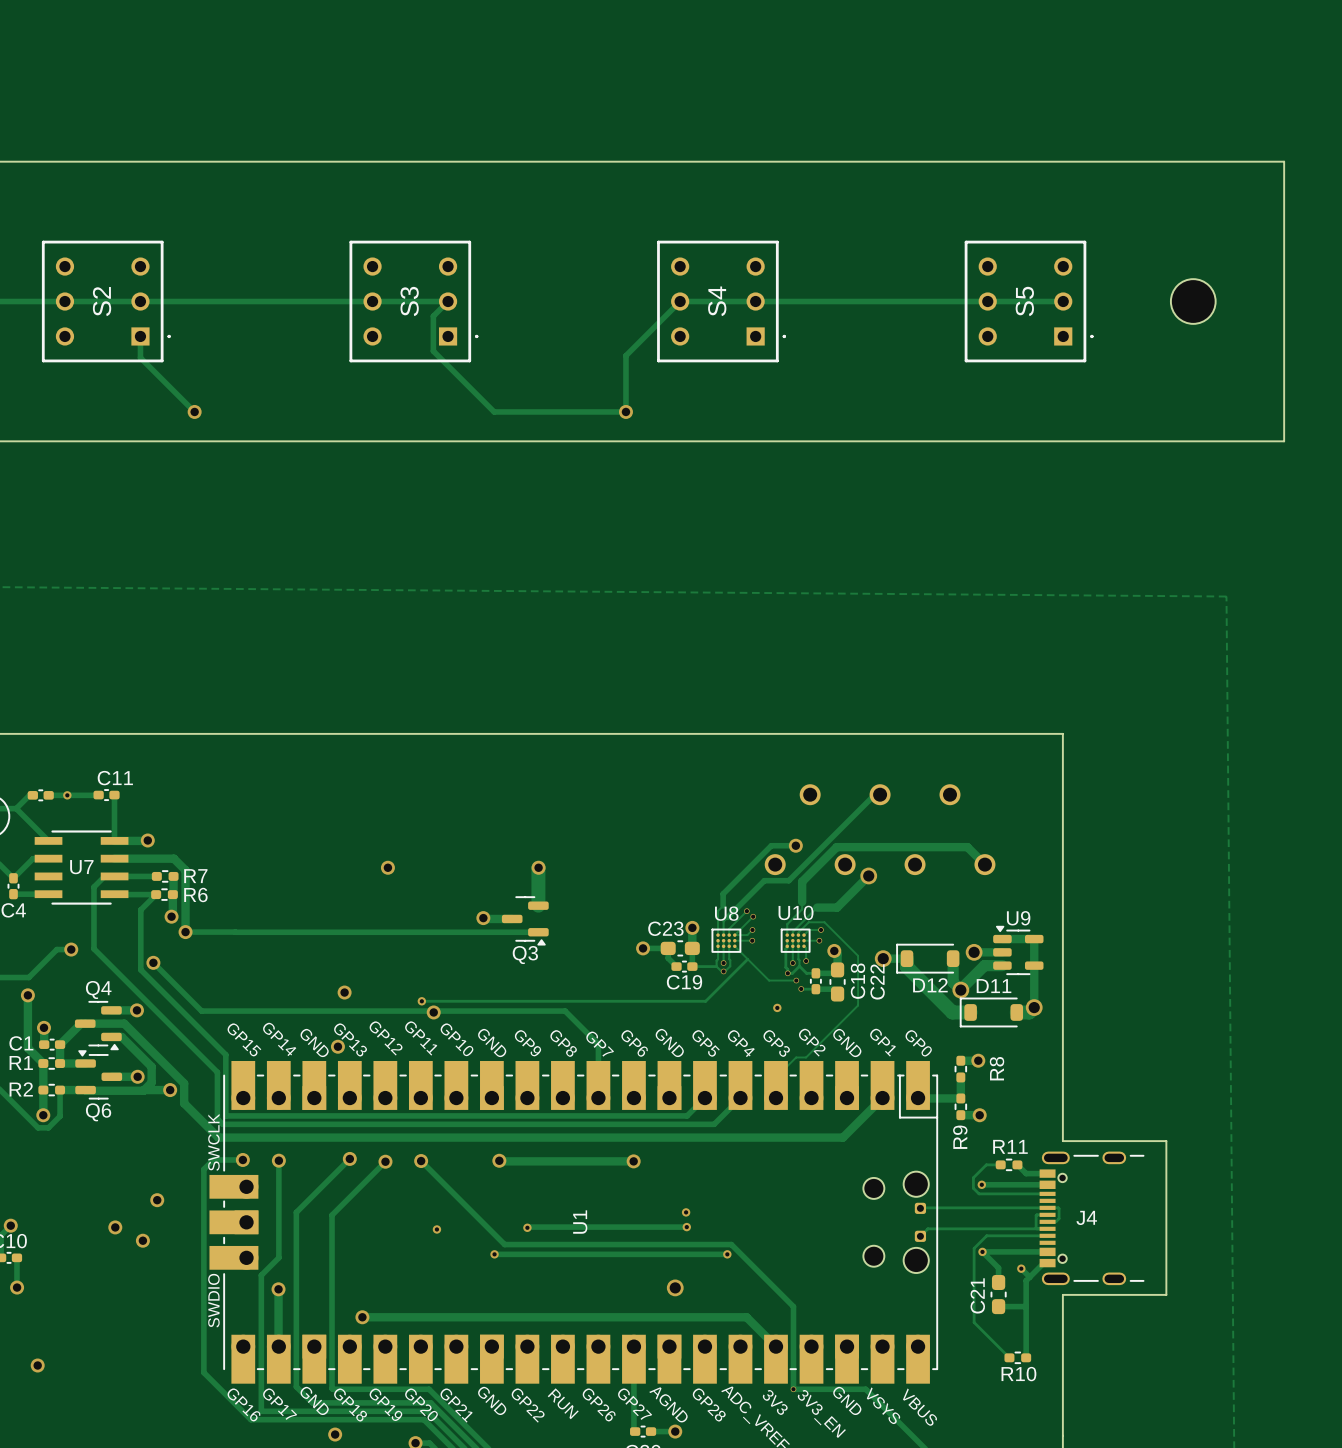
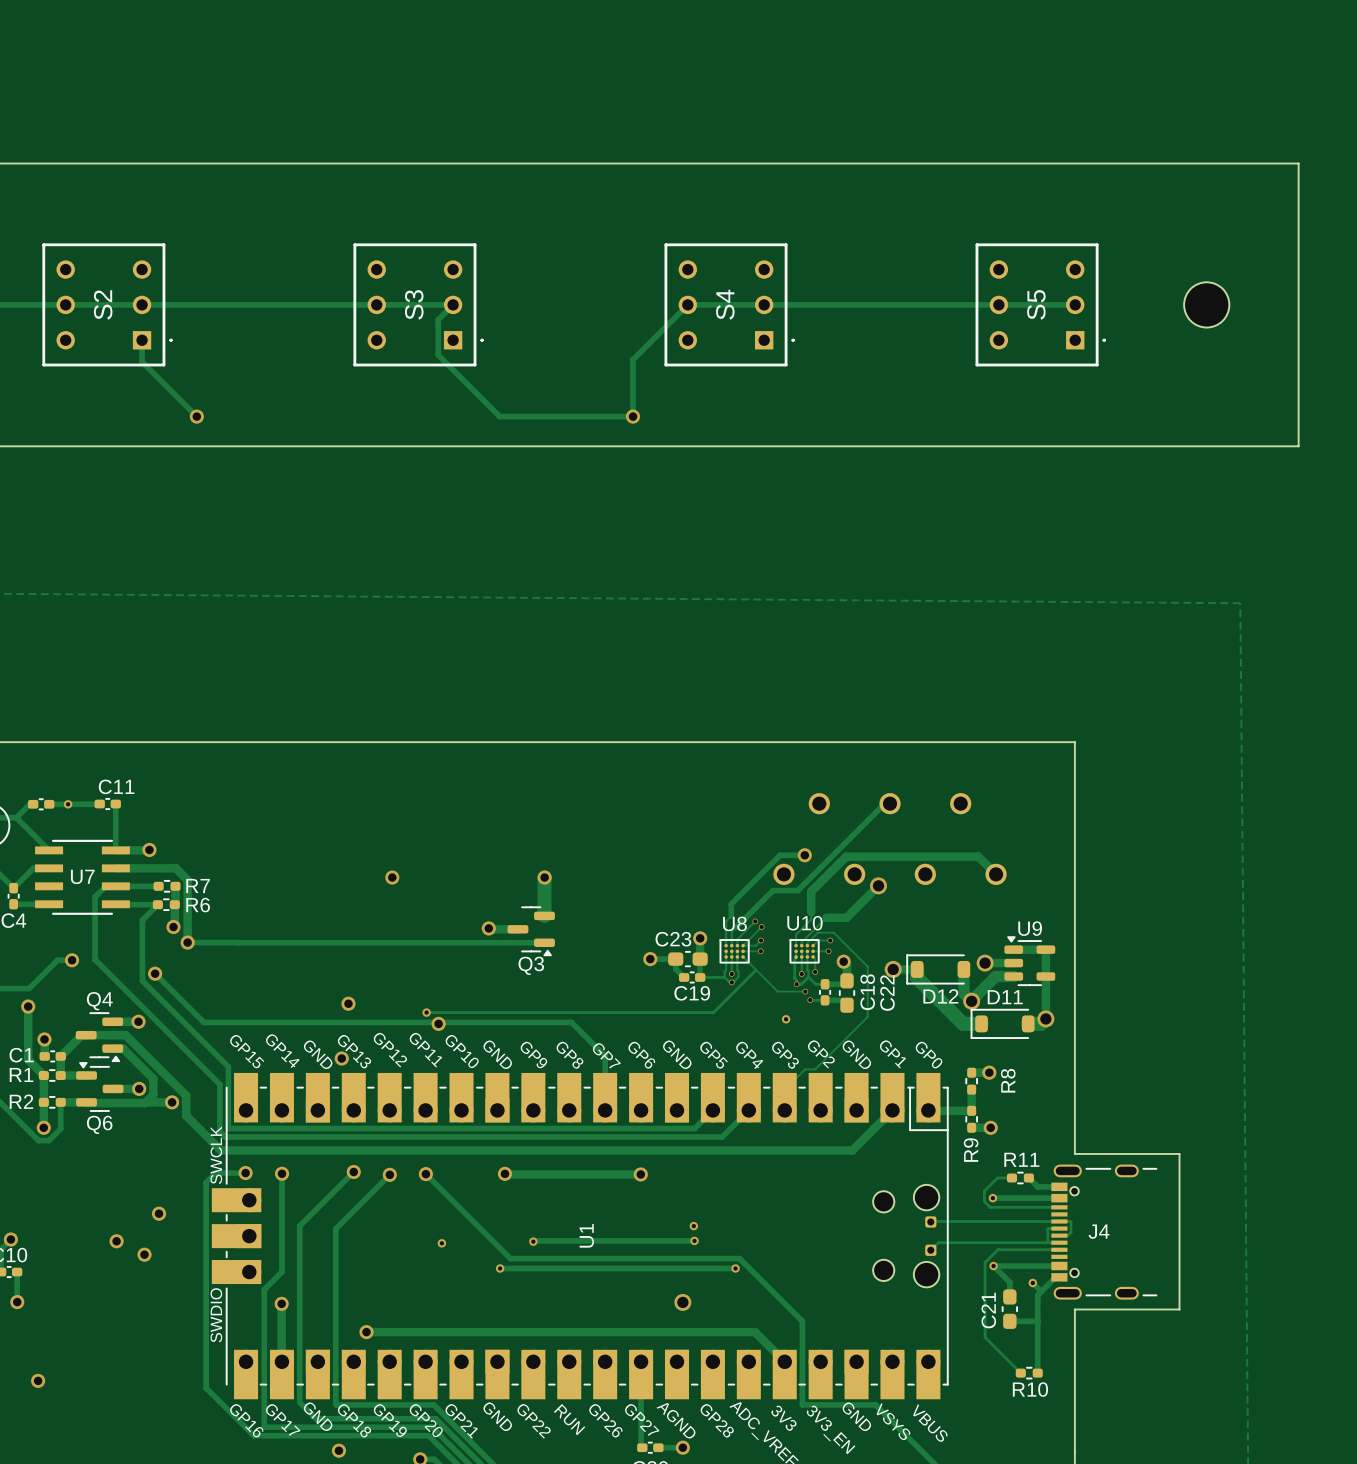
via: (793, 1389) -> none

